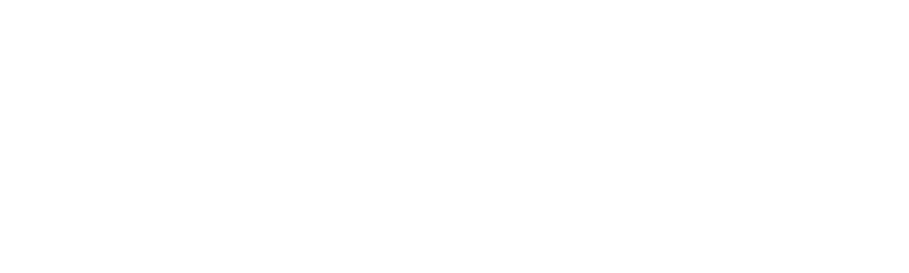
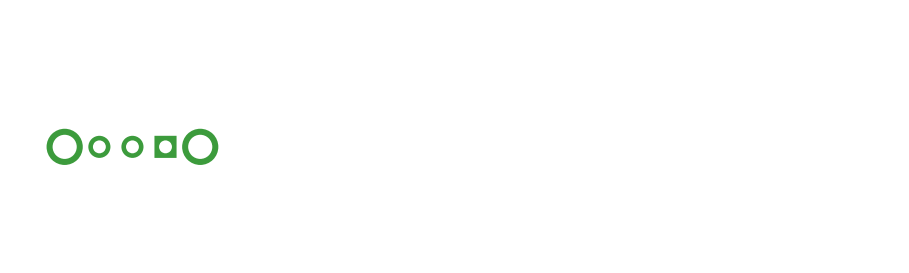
part: none -> (132, 146)

